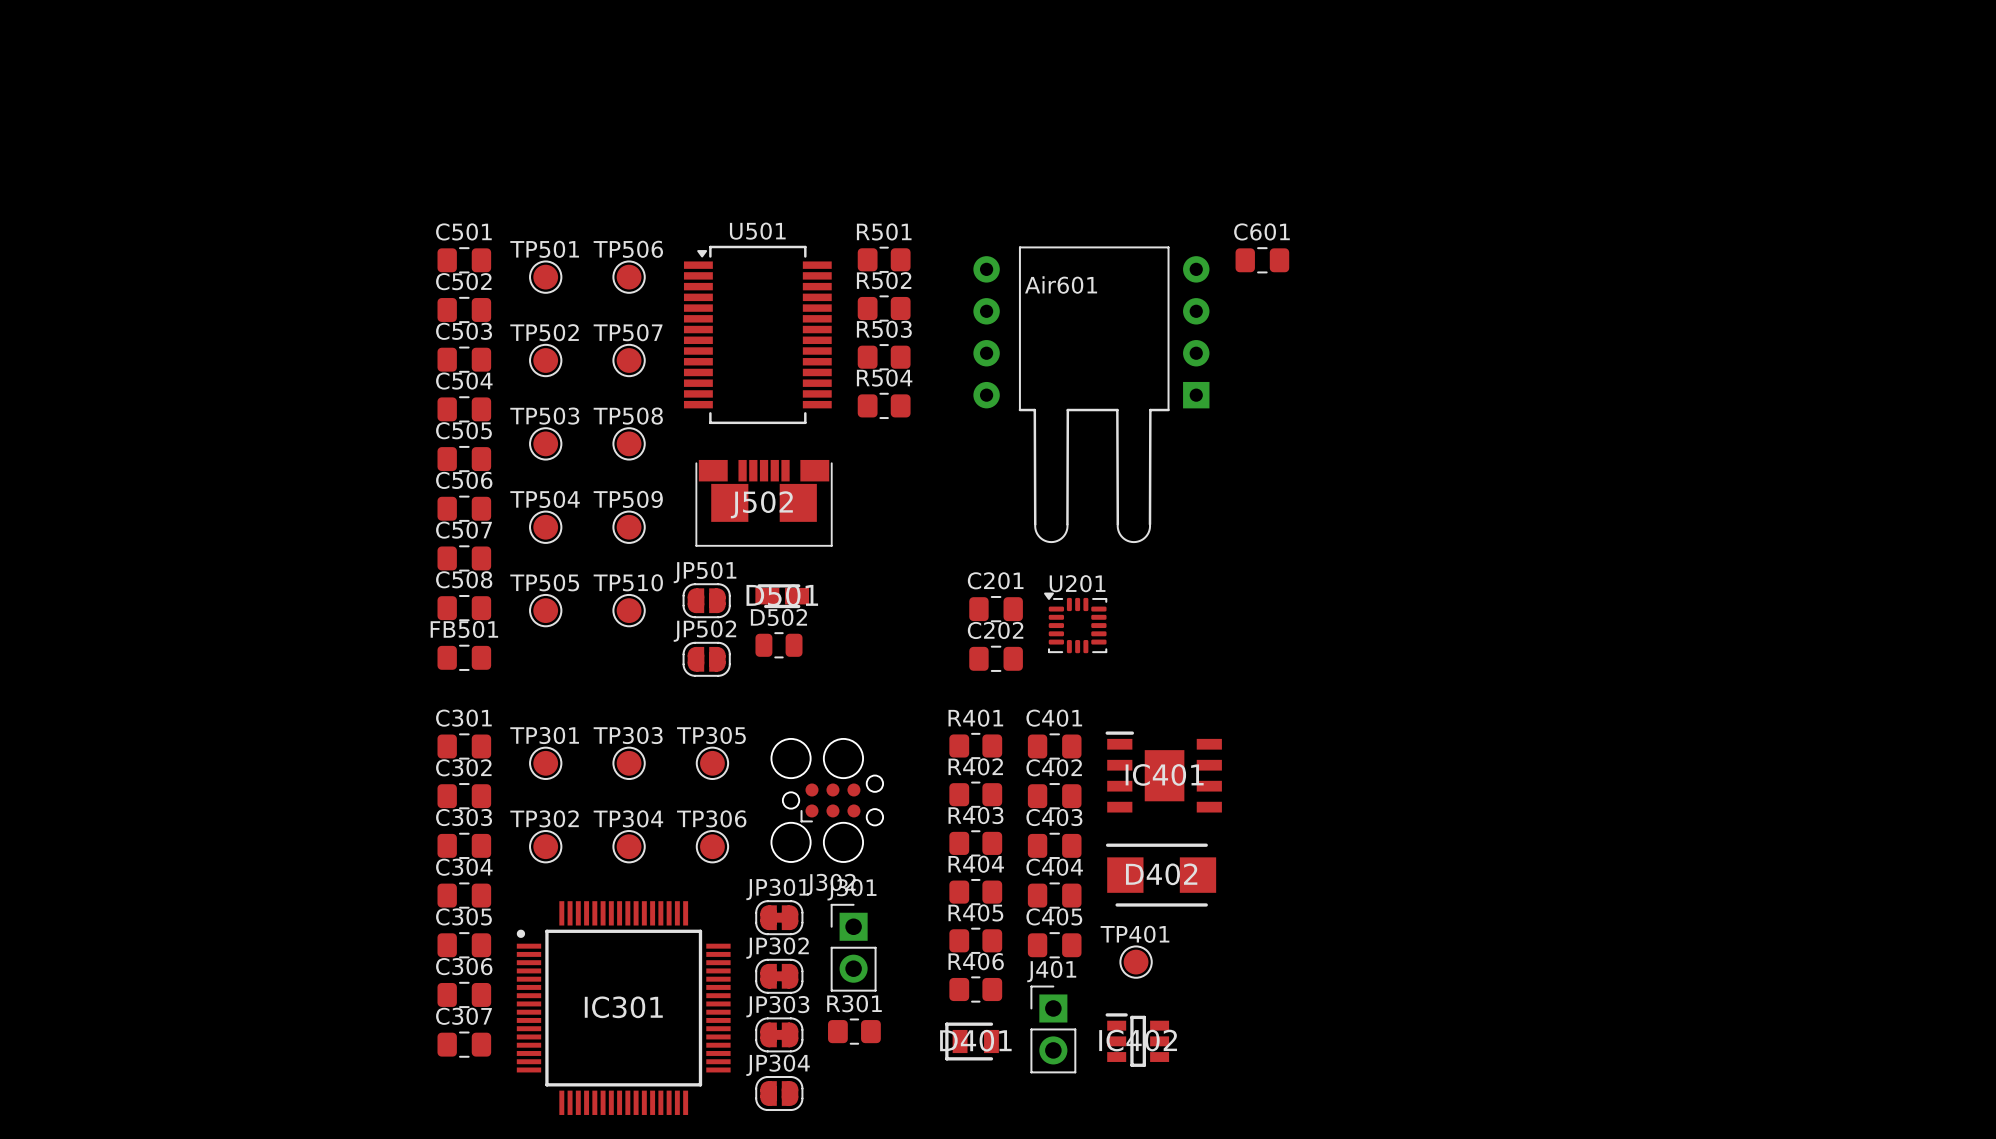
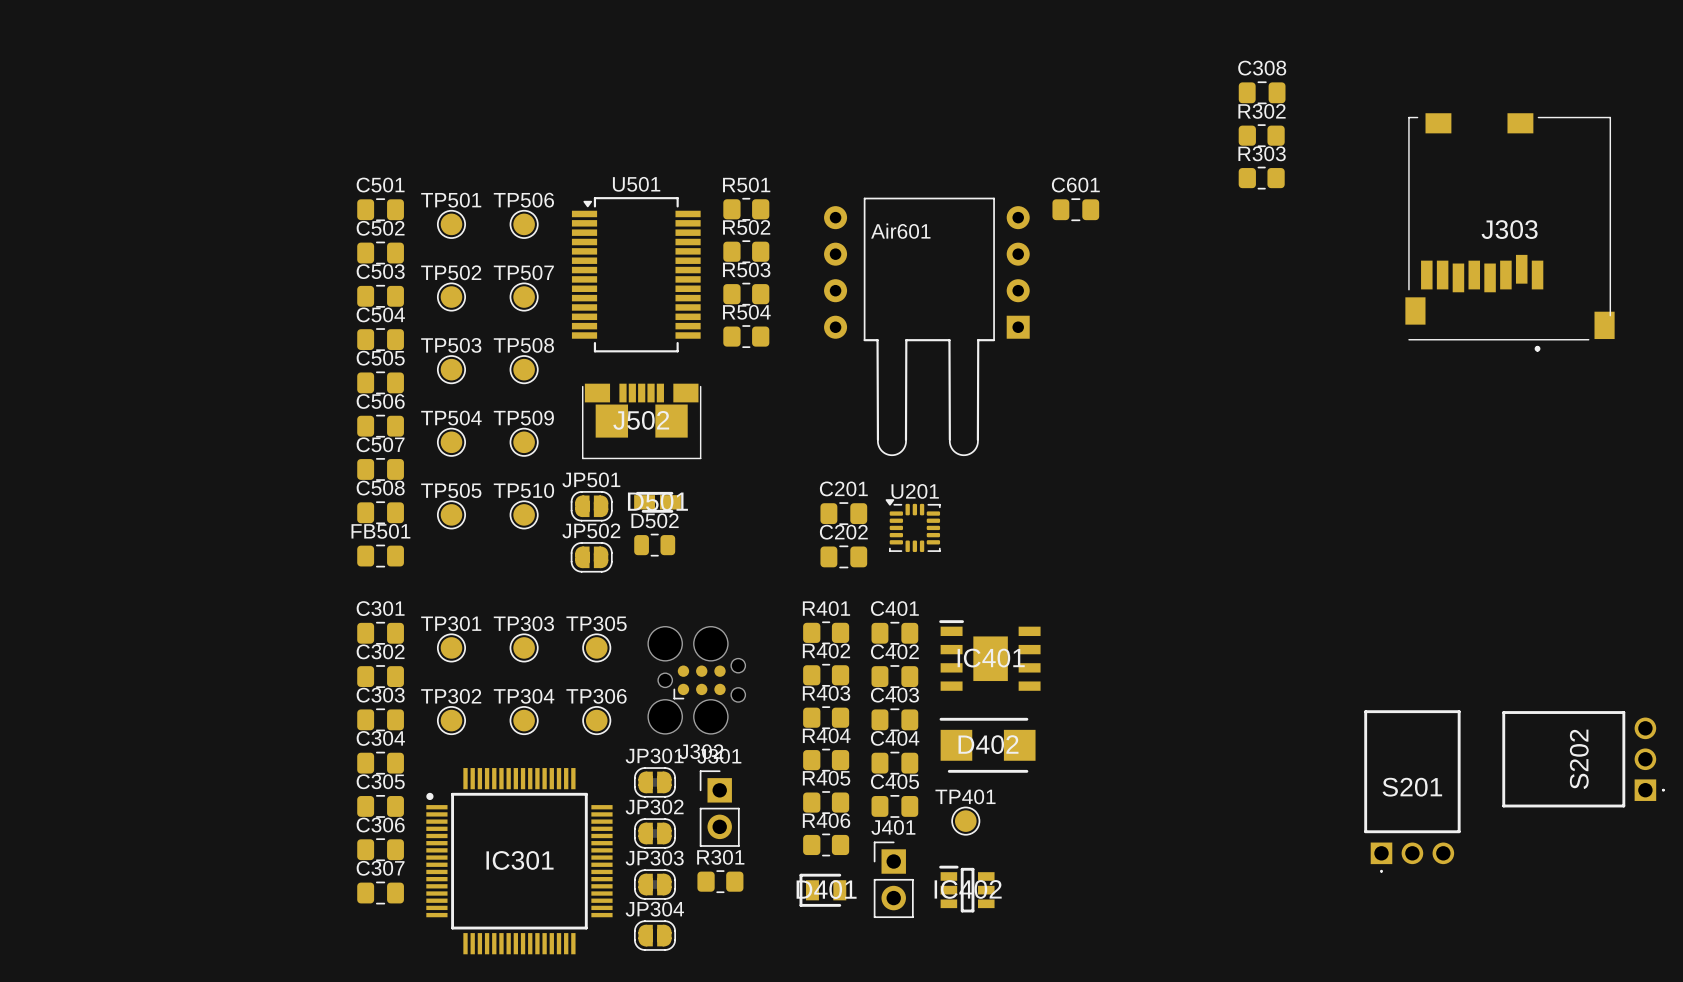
C308: none -> (1262, 92)
R302: none -> (1261, 135)
R303: none -> (1261, 178)
J303: none -> (1510, 232)
S202: none -> (1583, 759)
S201: none -> (1412, 791)

